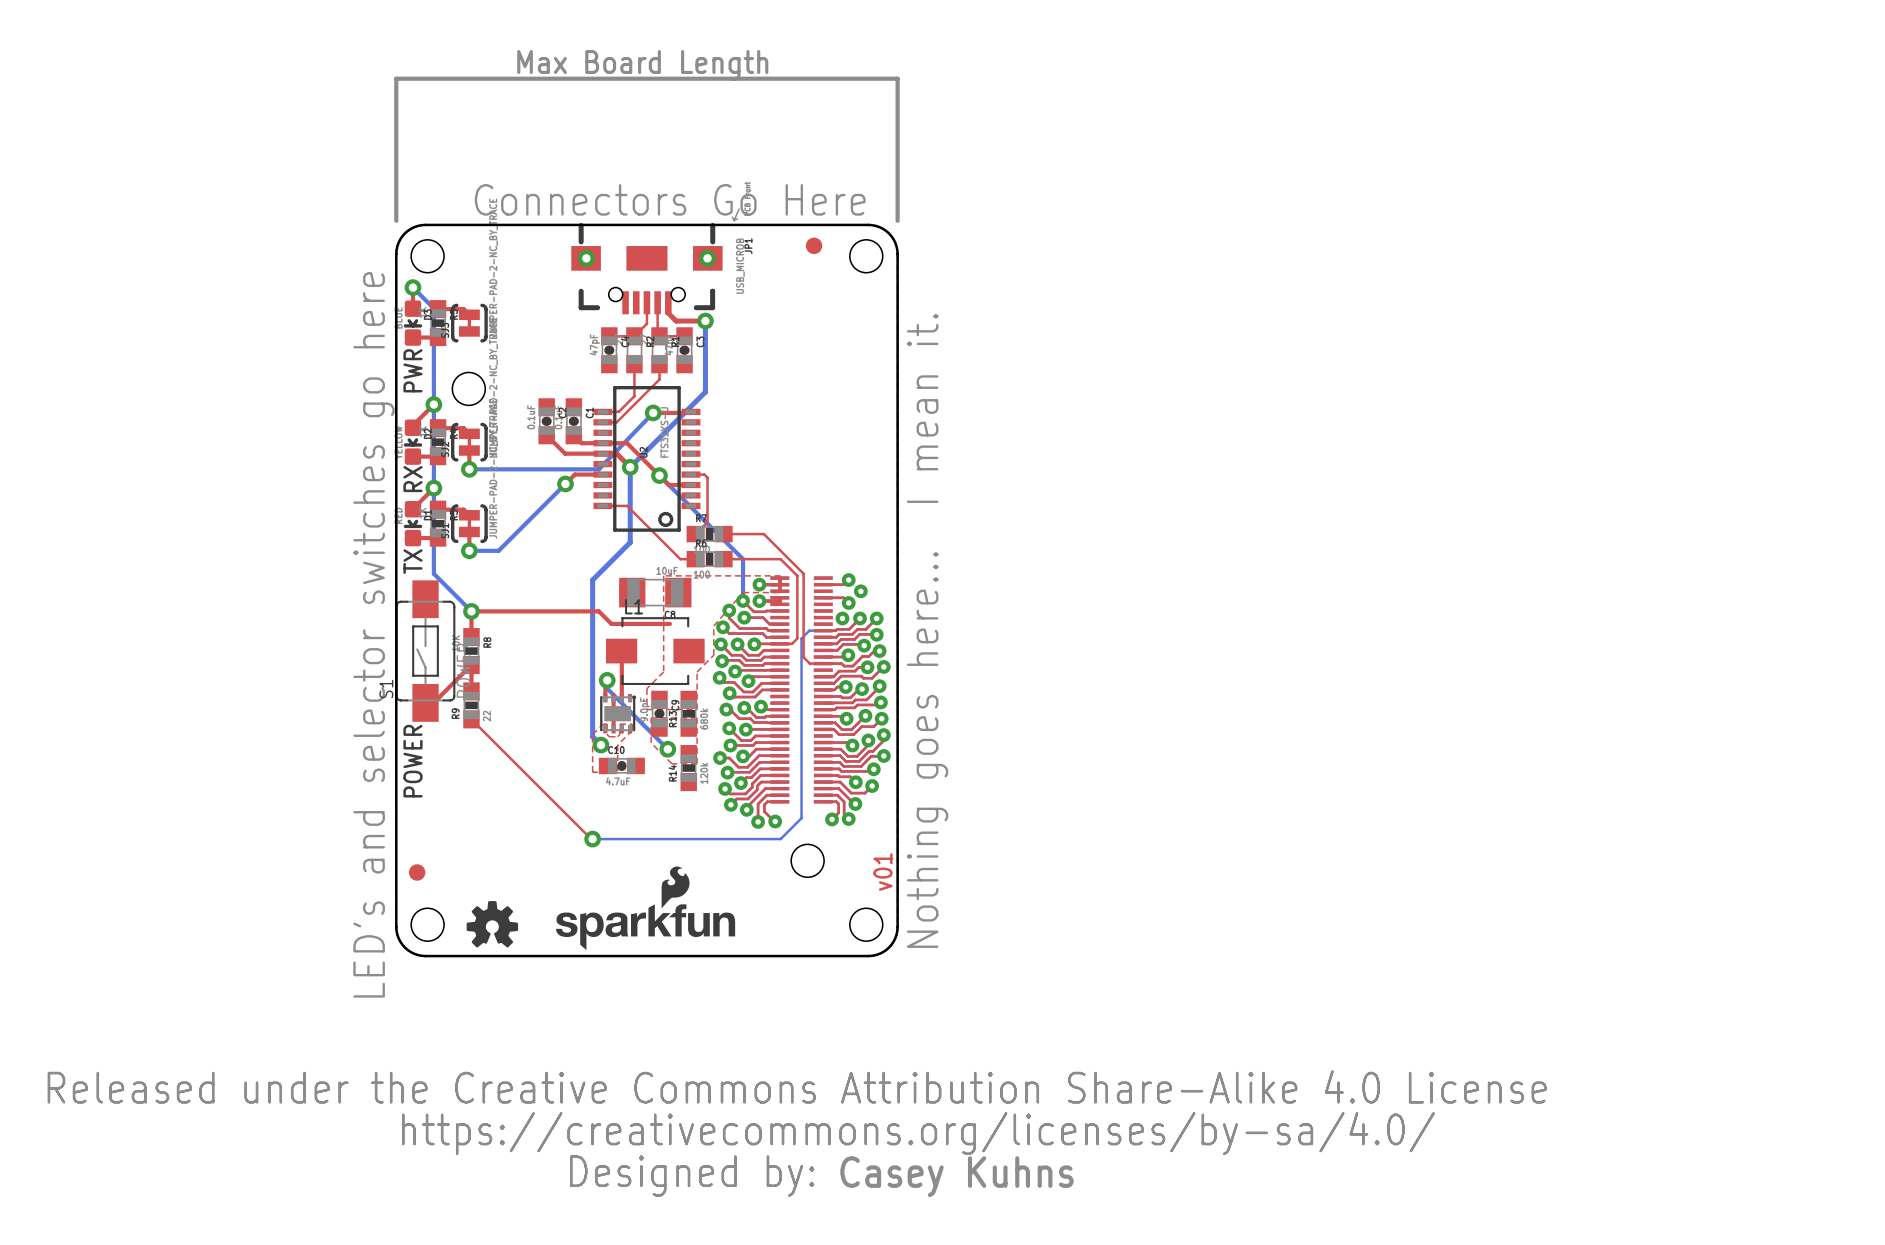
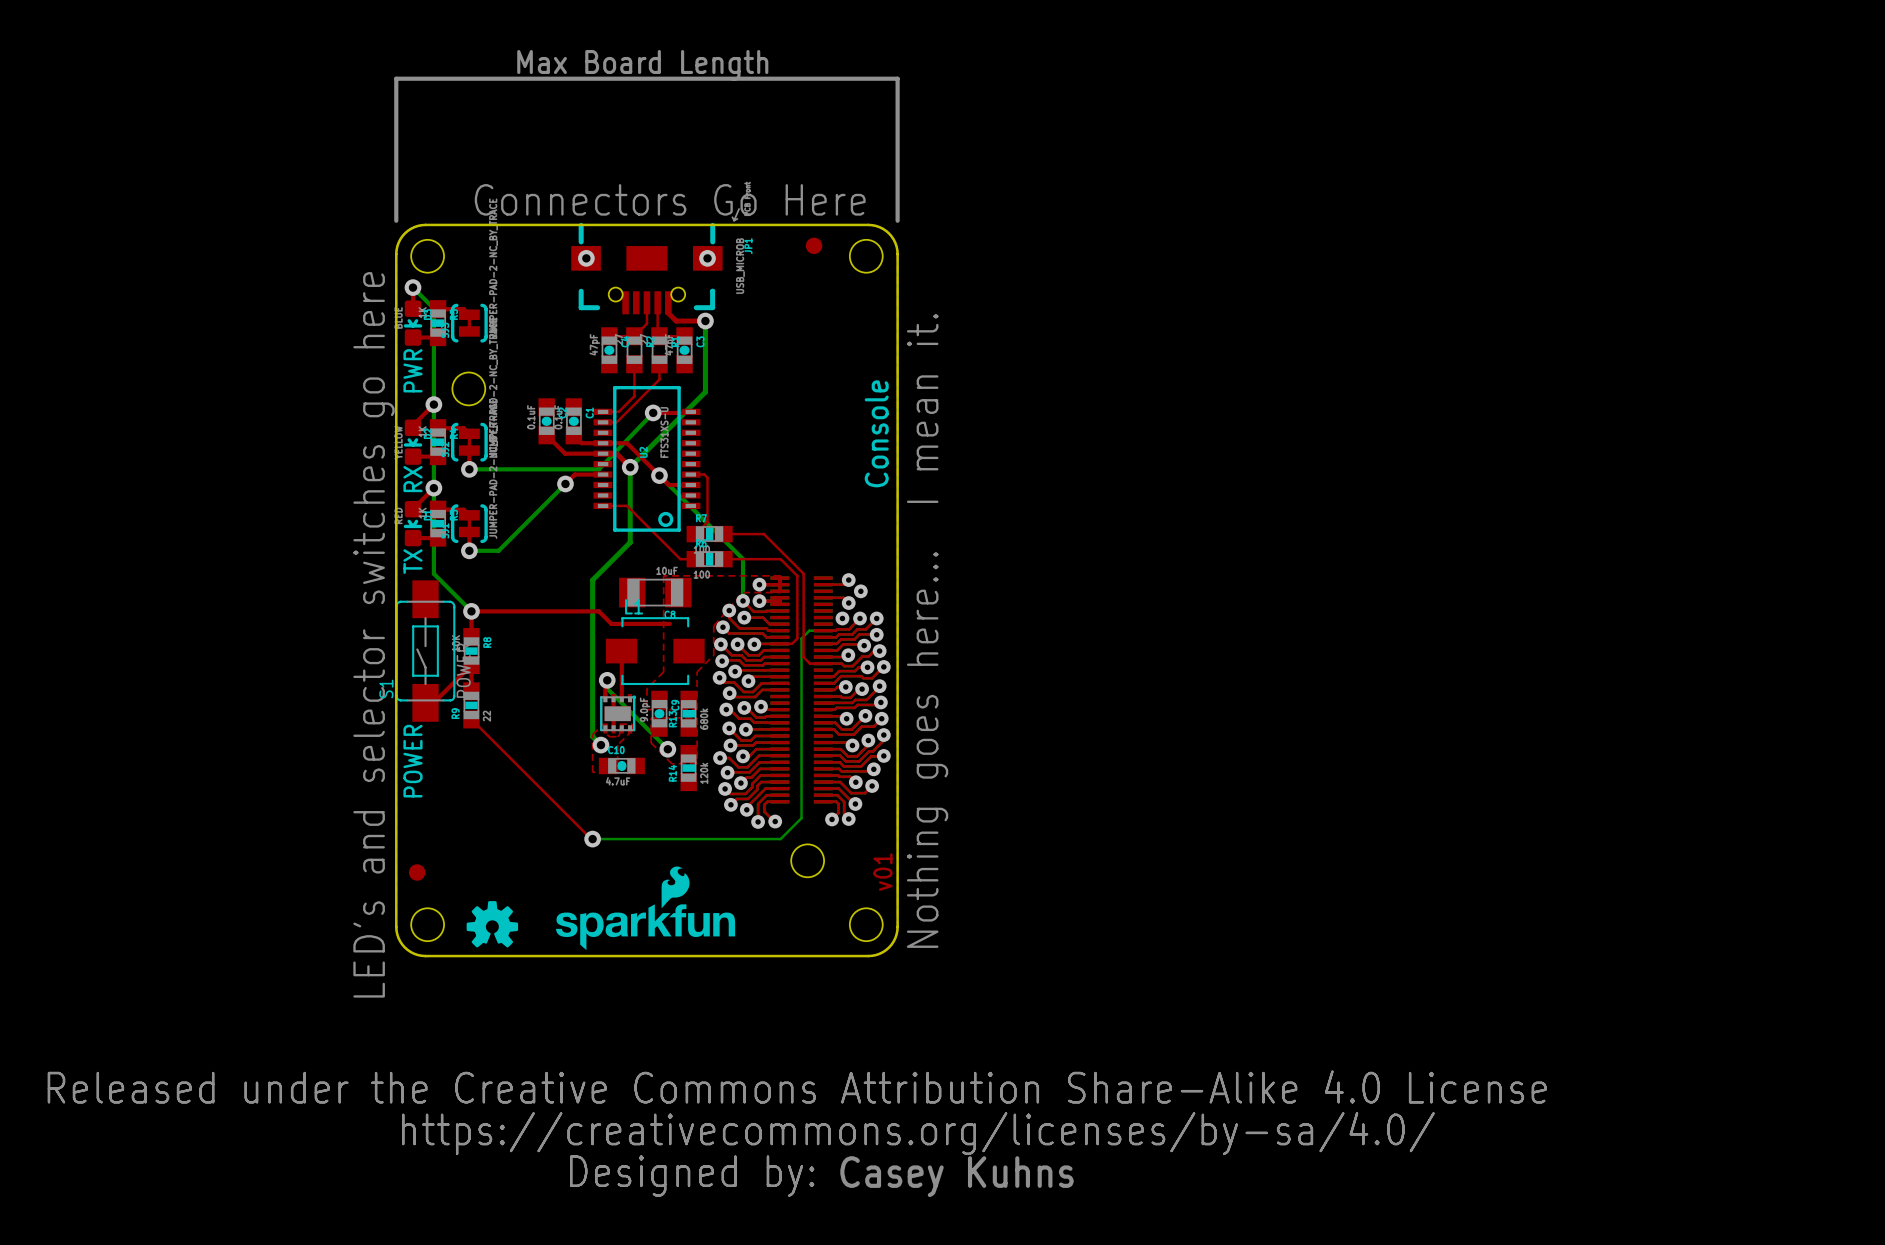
text: none -> Console (876, 433)

